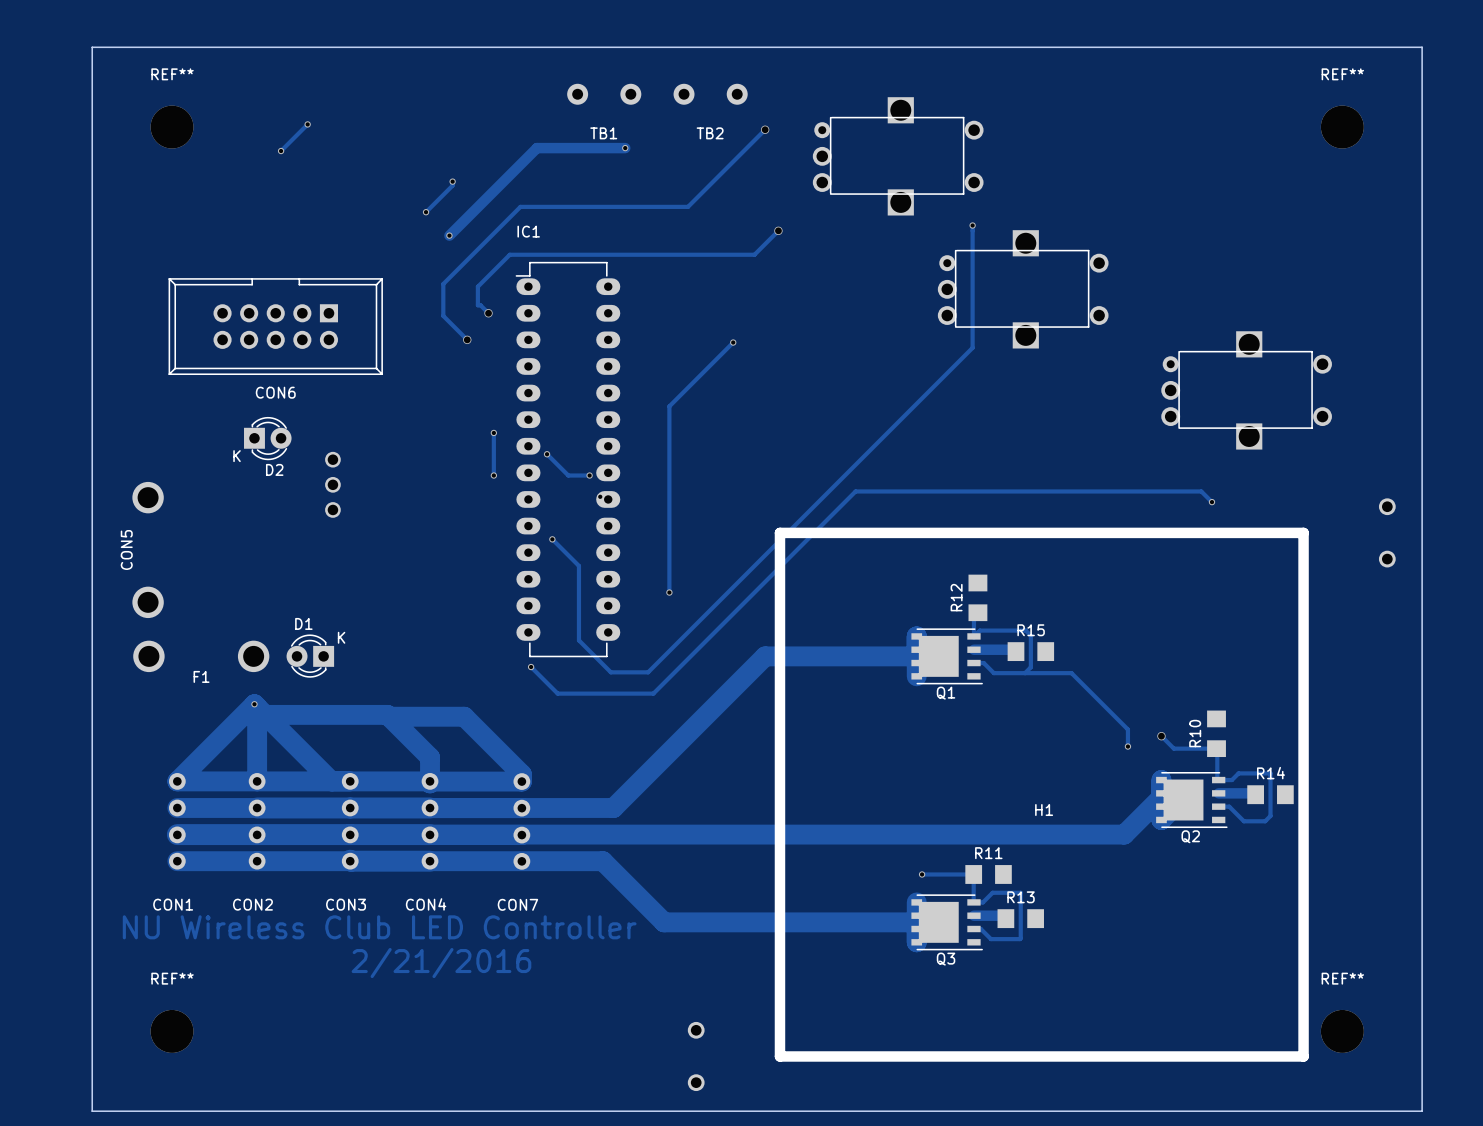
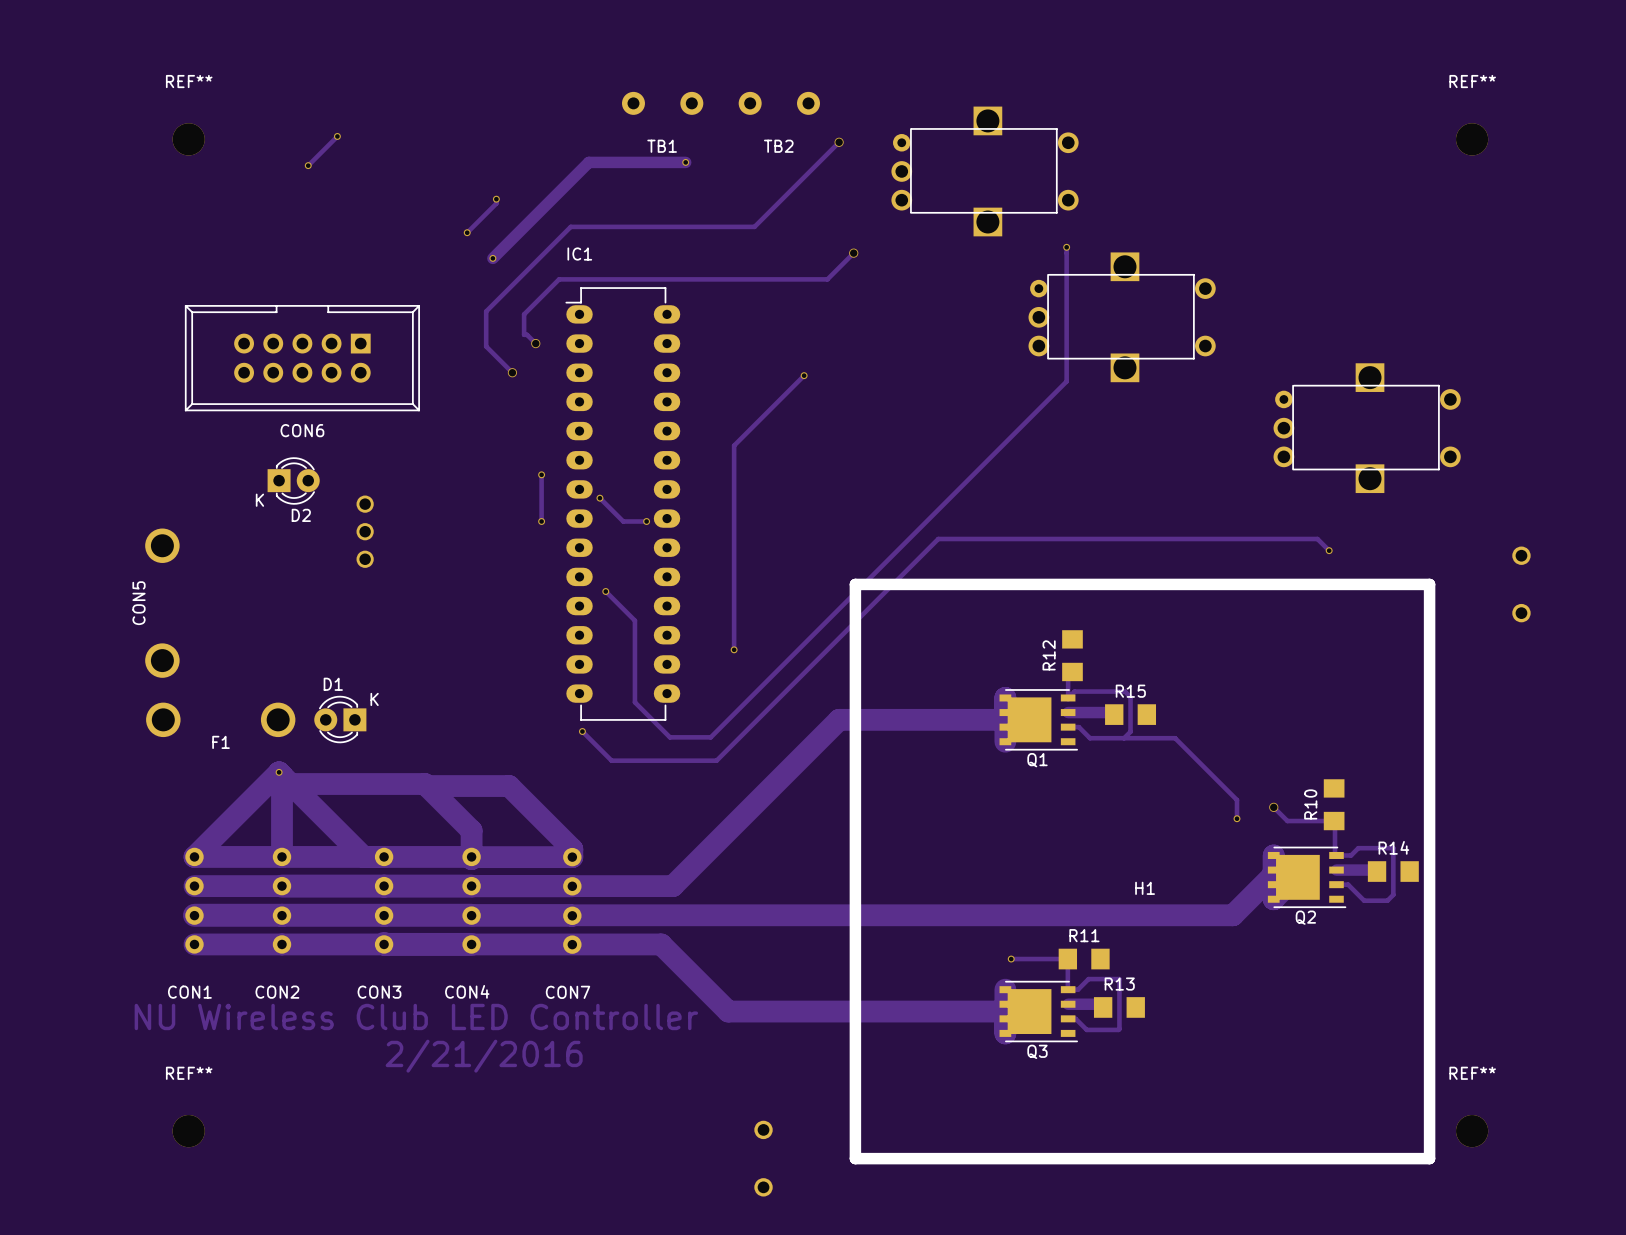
board edge: (92, 47) (92, 1111) (1422, 1111) (1422, 47) (92, 47) -> none
REF** footprint: [150, 105, 194, 149] -> [172, 123, 205, 156]
REF** footprint: [1320, 105, 1364, 149] -> [1456, 123, 1489, 156]
via: (600, 496) -> none
REF** footprint: [150, 1009, 194, 1053] -> [172, 1115, 205, 1148]
REF** footprint: [1320, 1009, 1364, 1053] -> [1456, 1115, 1489, 1148]

